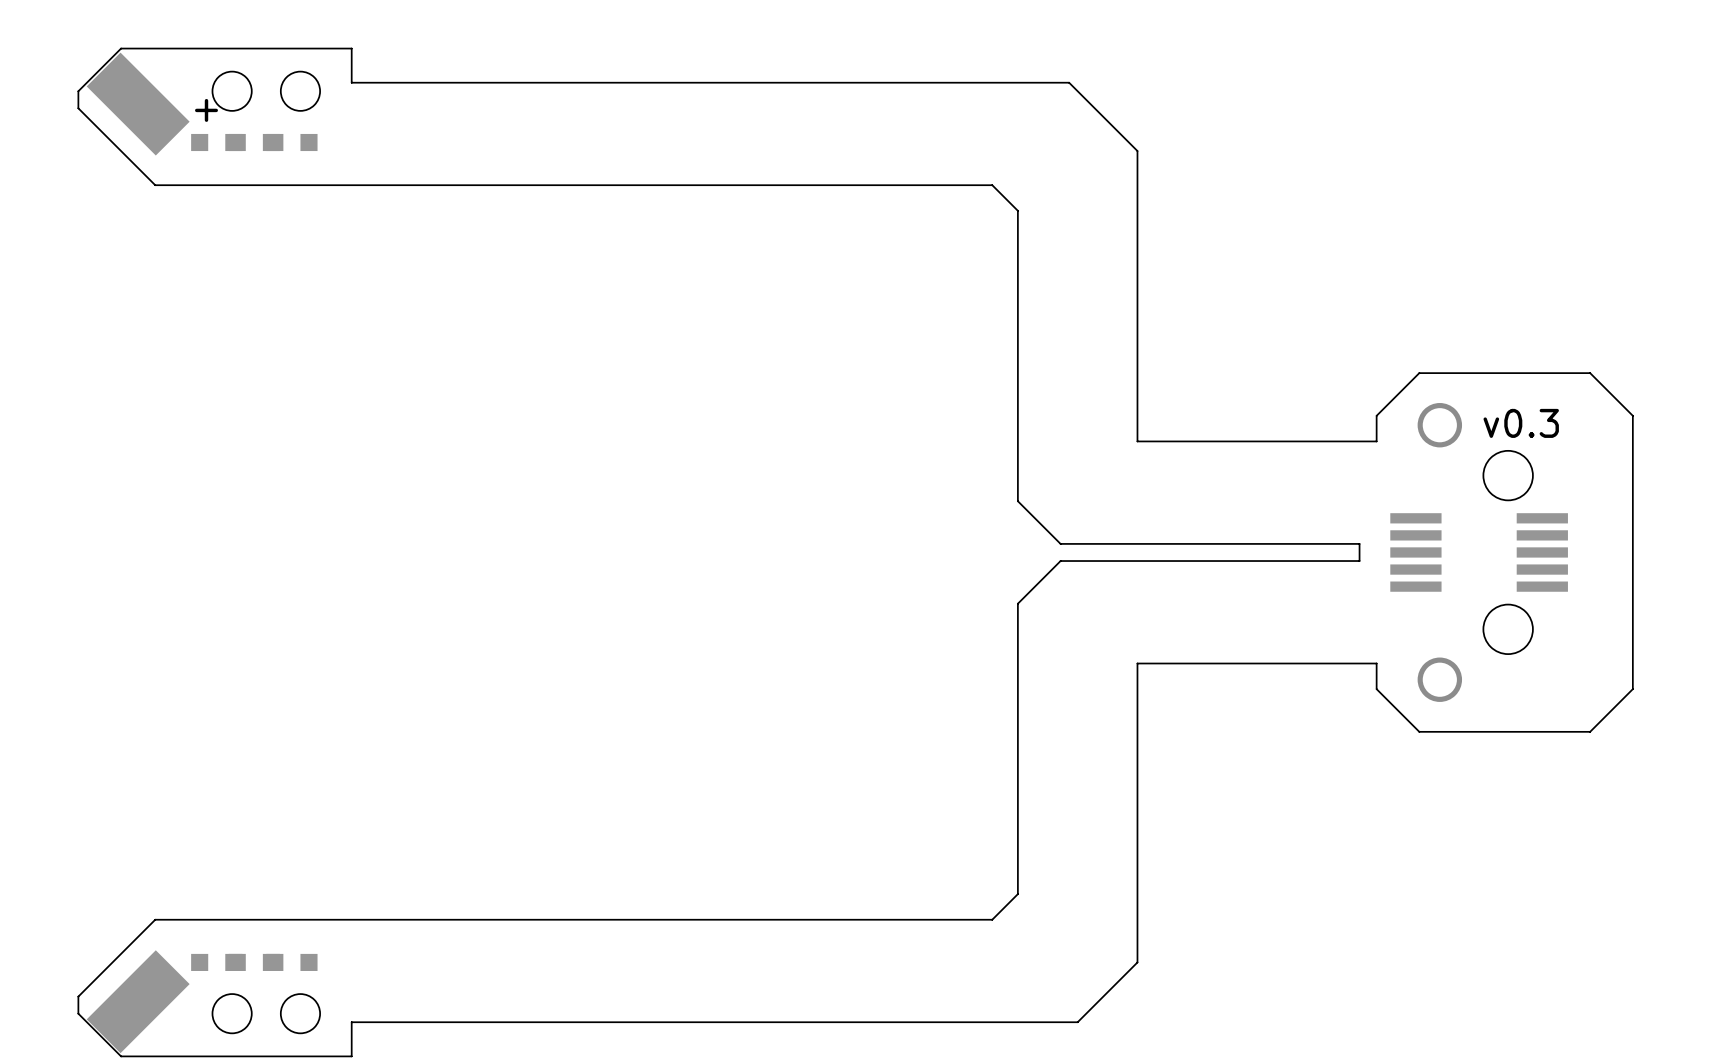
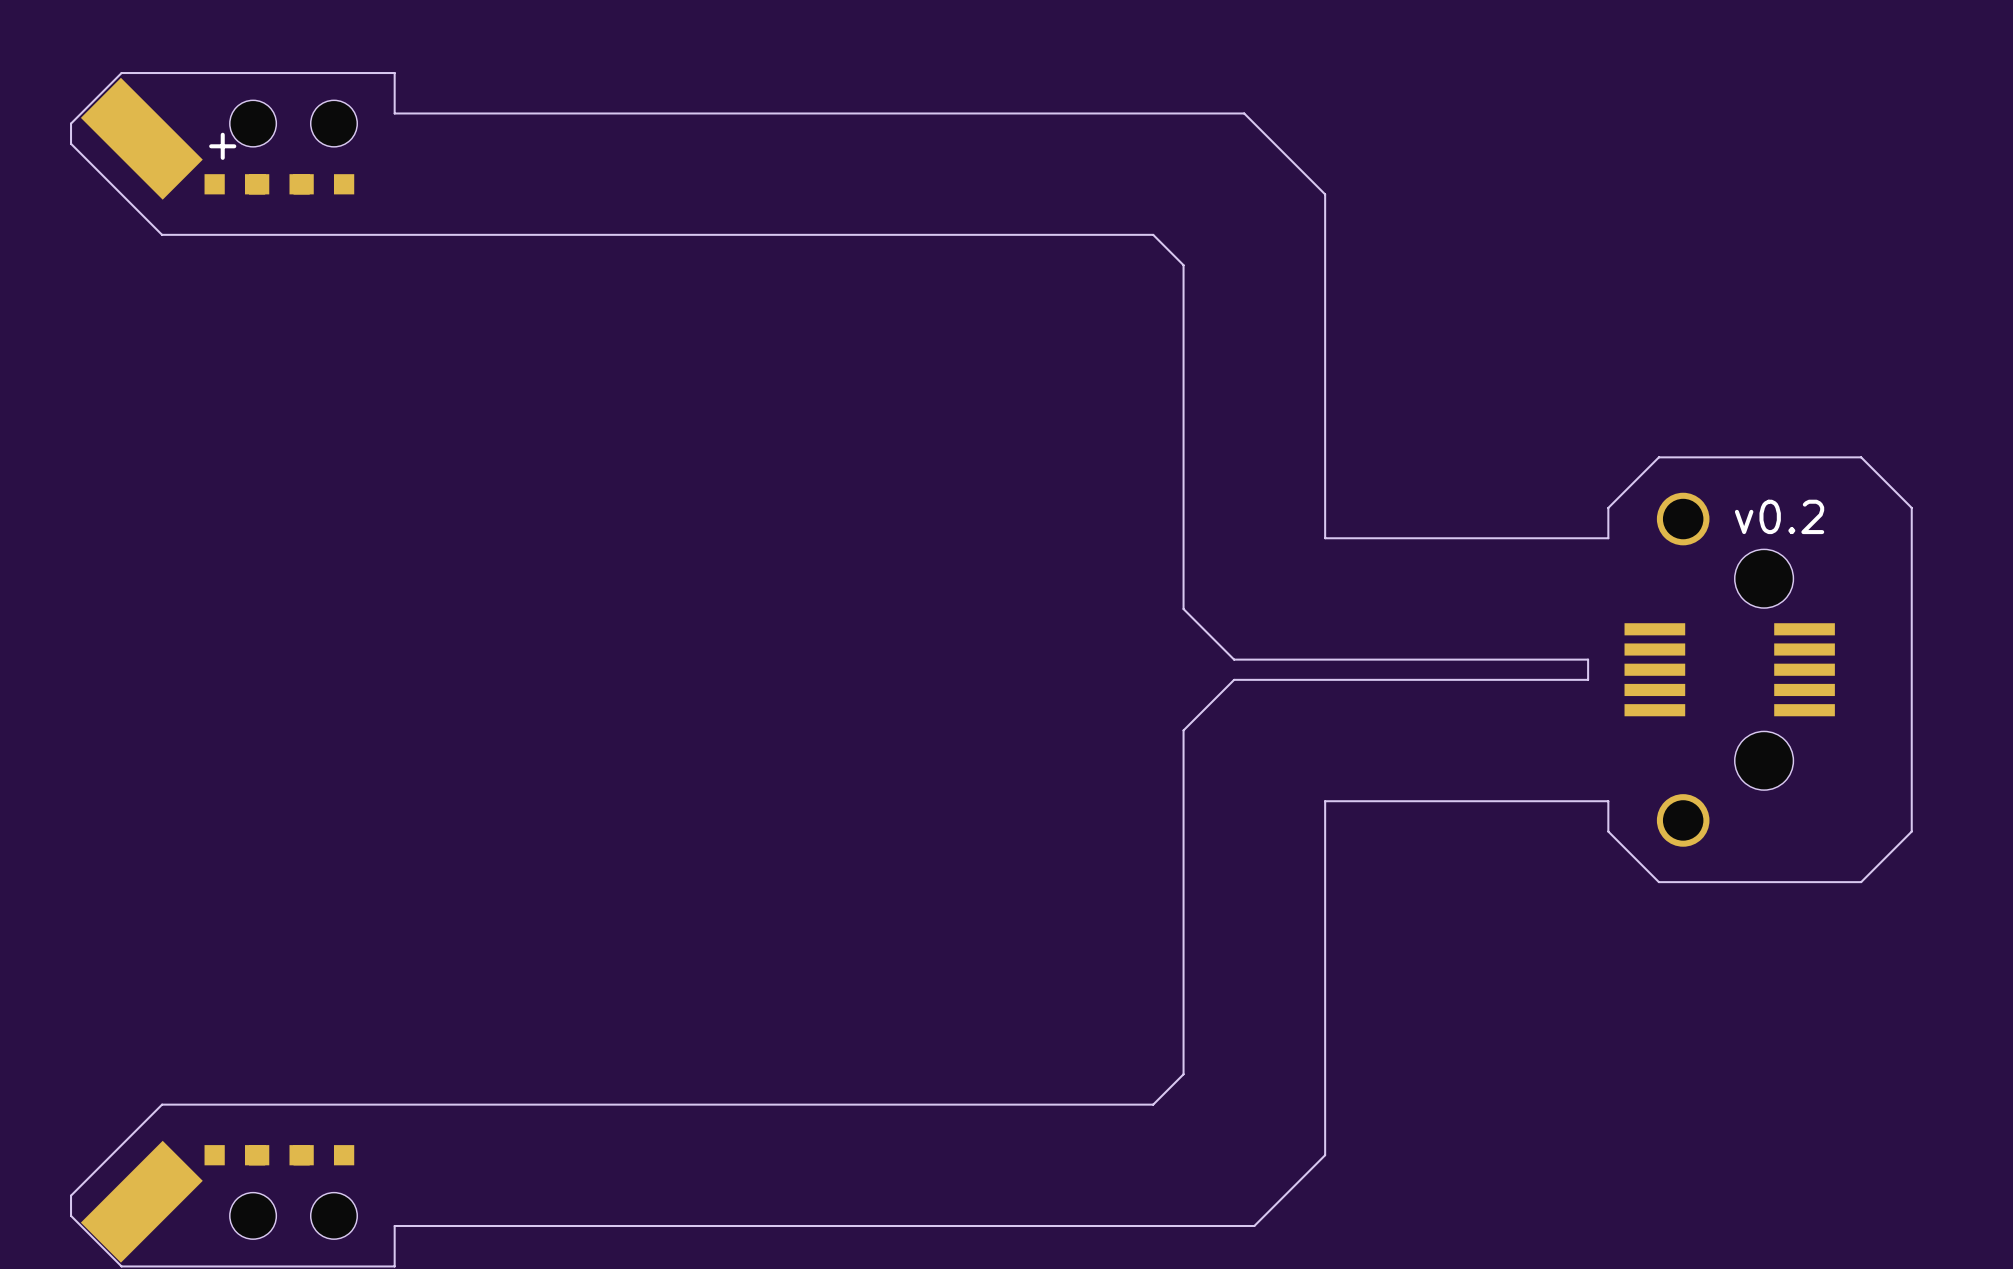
text: v0.3 (1521, 423) -> v0.2 (1779, 516)

